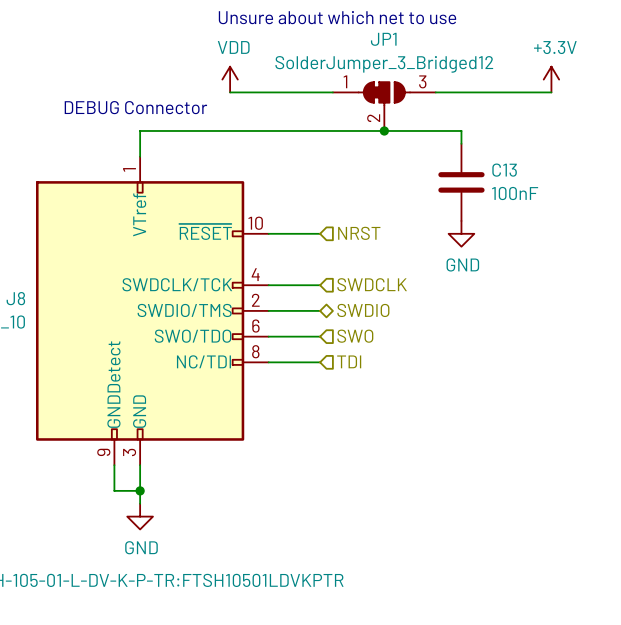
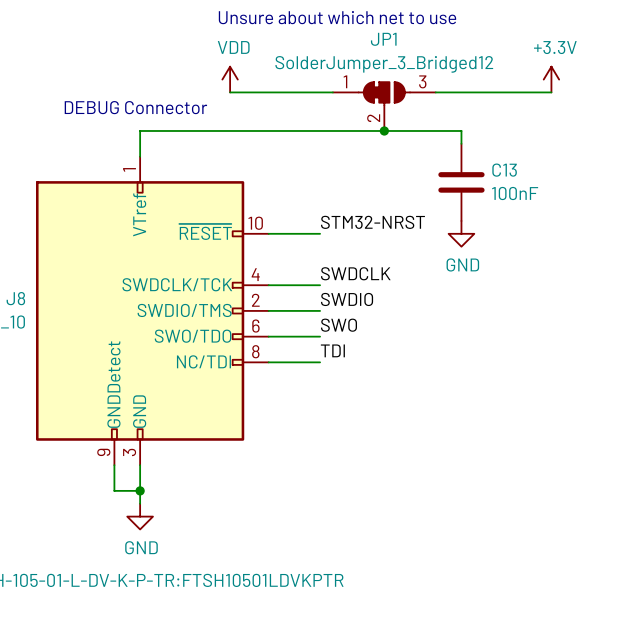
label: none -> STM32-NRST (372, 222)
hierarchical label: NRST (359, 233) -> none
label: none -> SWDCLK (355, 273)
hierarchical label: SWDCLK (372, 284) -> none
label: none -> SWDIO (347, 299)
hierarchical label: SWDIO (363, 310) -> none
label: none -> SWO (339, 325)
hierarchical label: SWO (355, 336) -> none
label: none -> TDI (332, 350)
hierarchical label: TDI (349, 361) -> none

